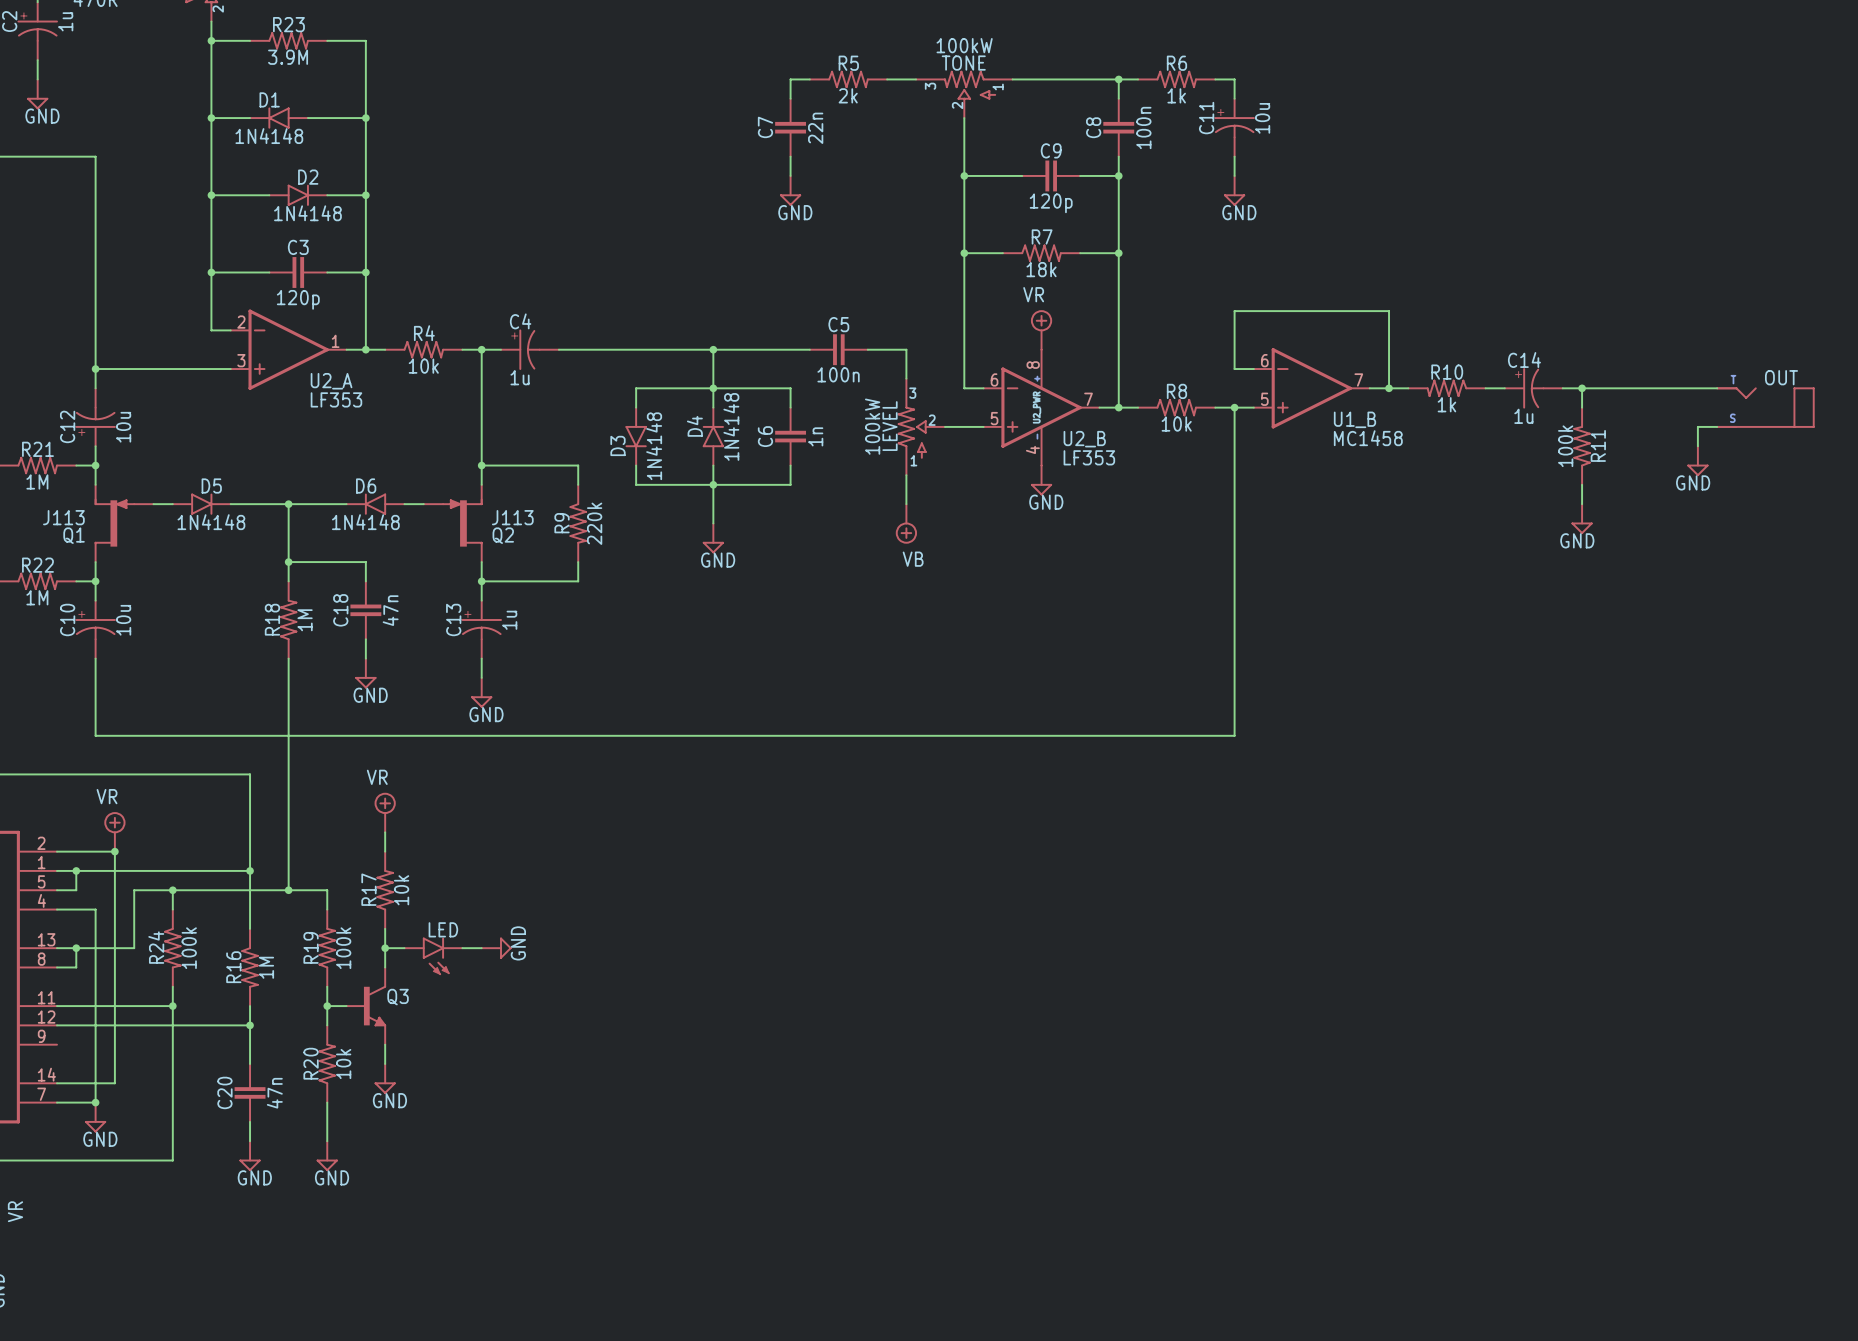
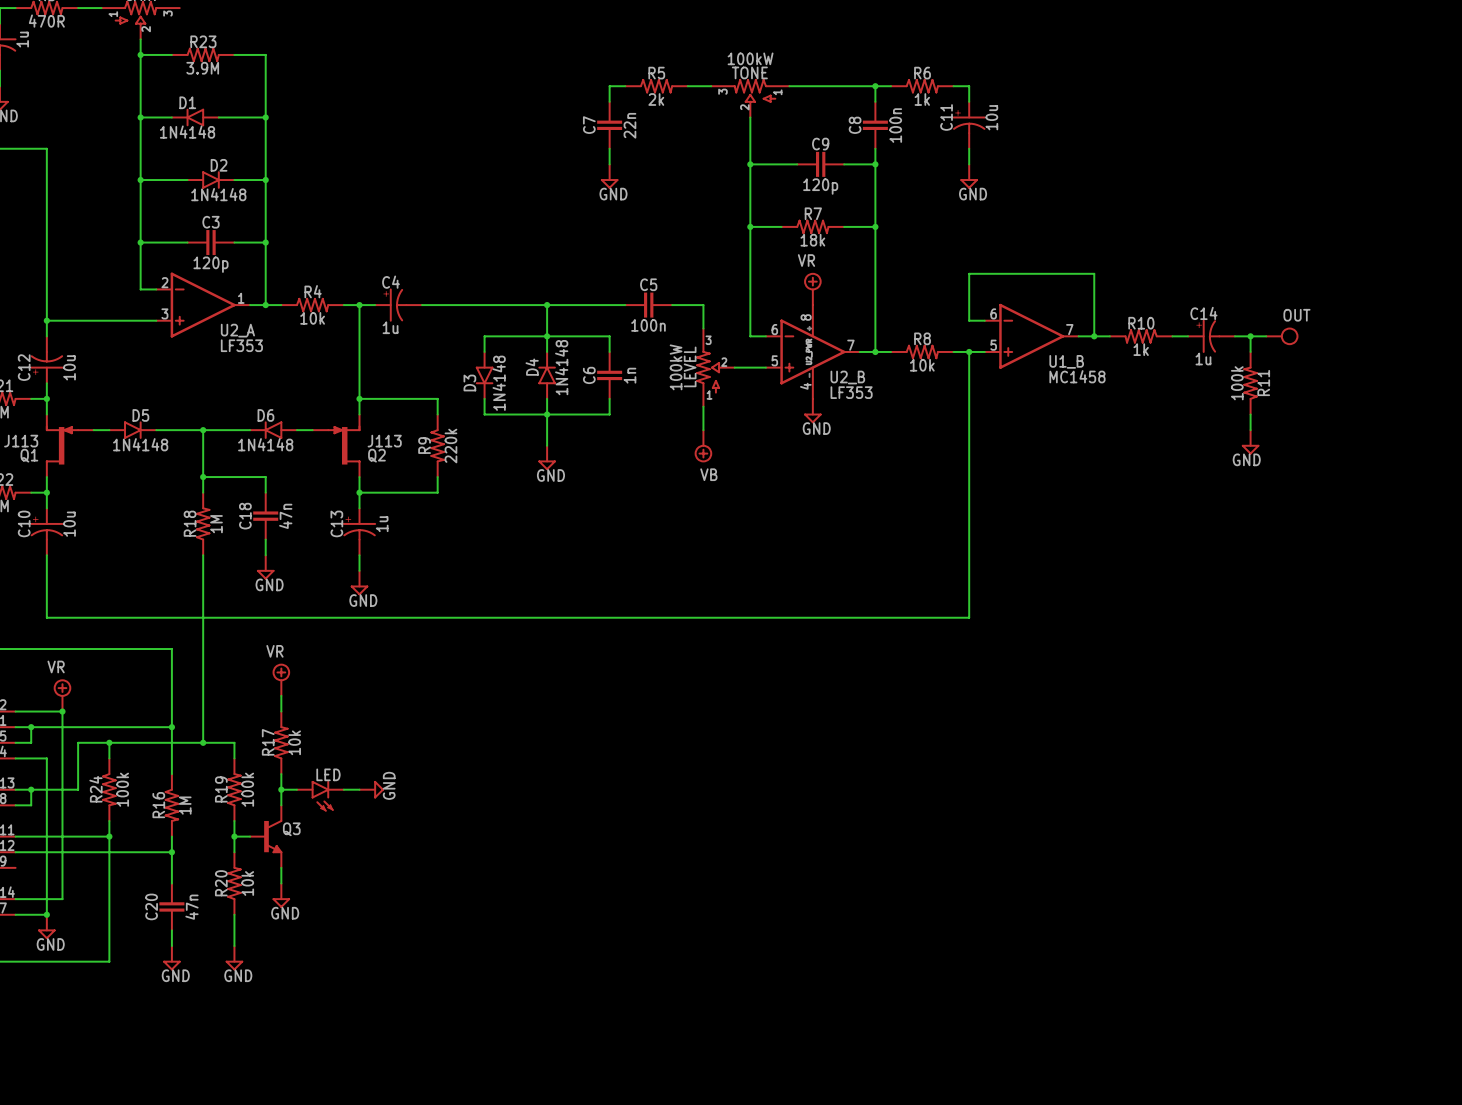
wire: (1601, 388) (1717, 388) -> none
OUT: none -> (1282, 336)
OUT: (1765, 407) -> none
wire: (1717, 426) (1697, 426) (1697, 446) -> none
power symbol: GND (1697, 461) -> none

